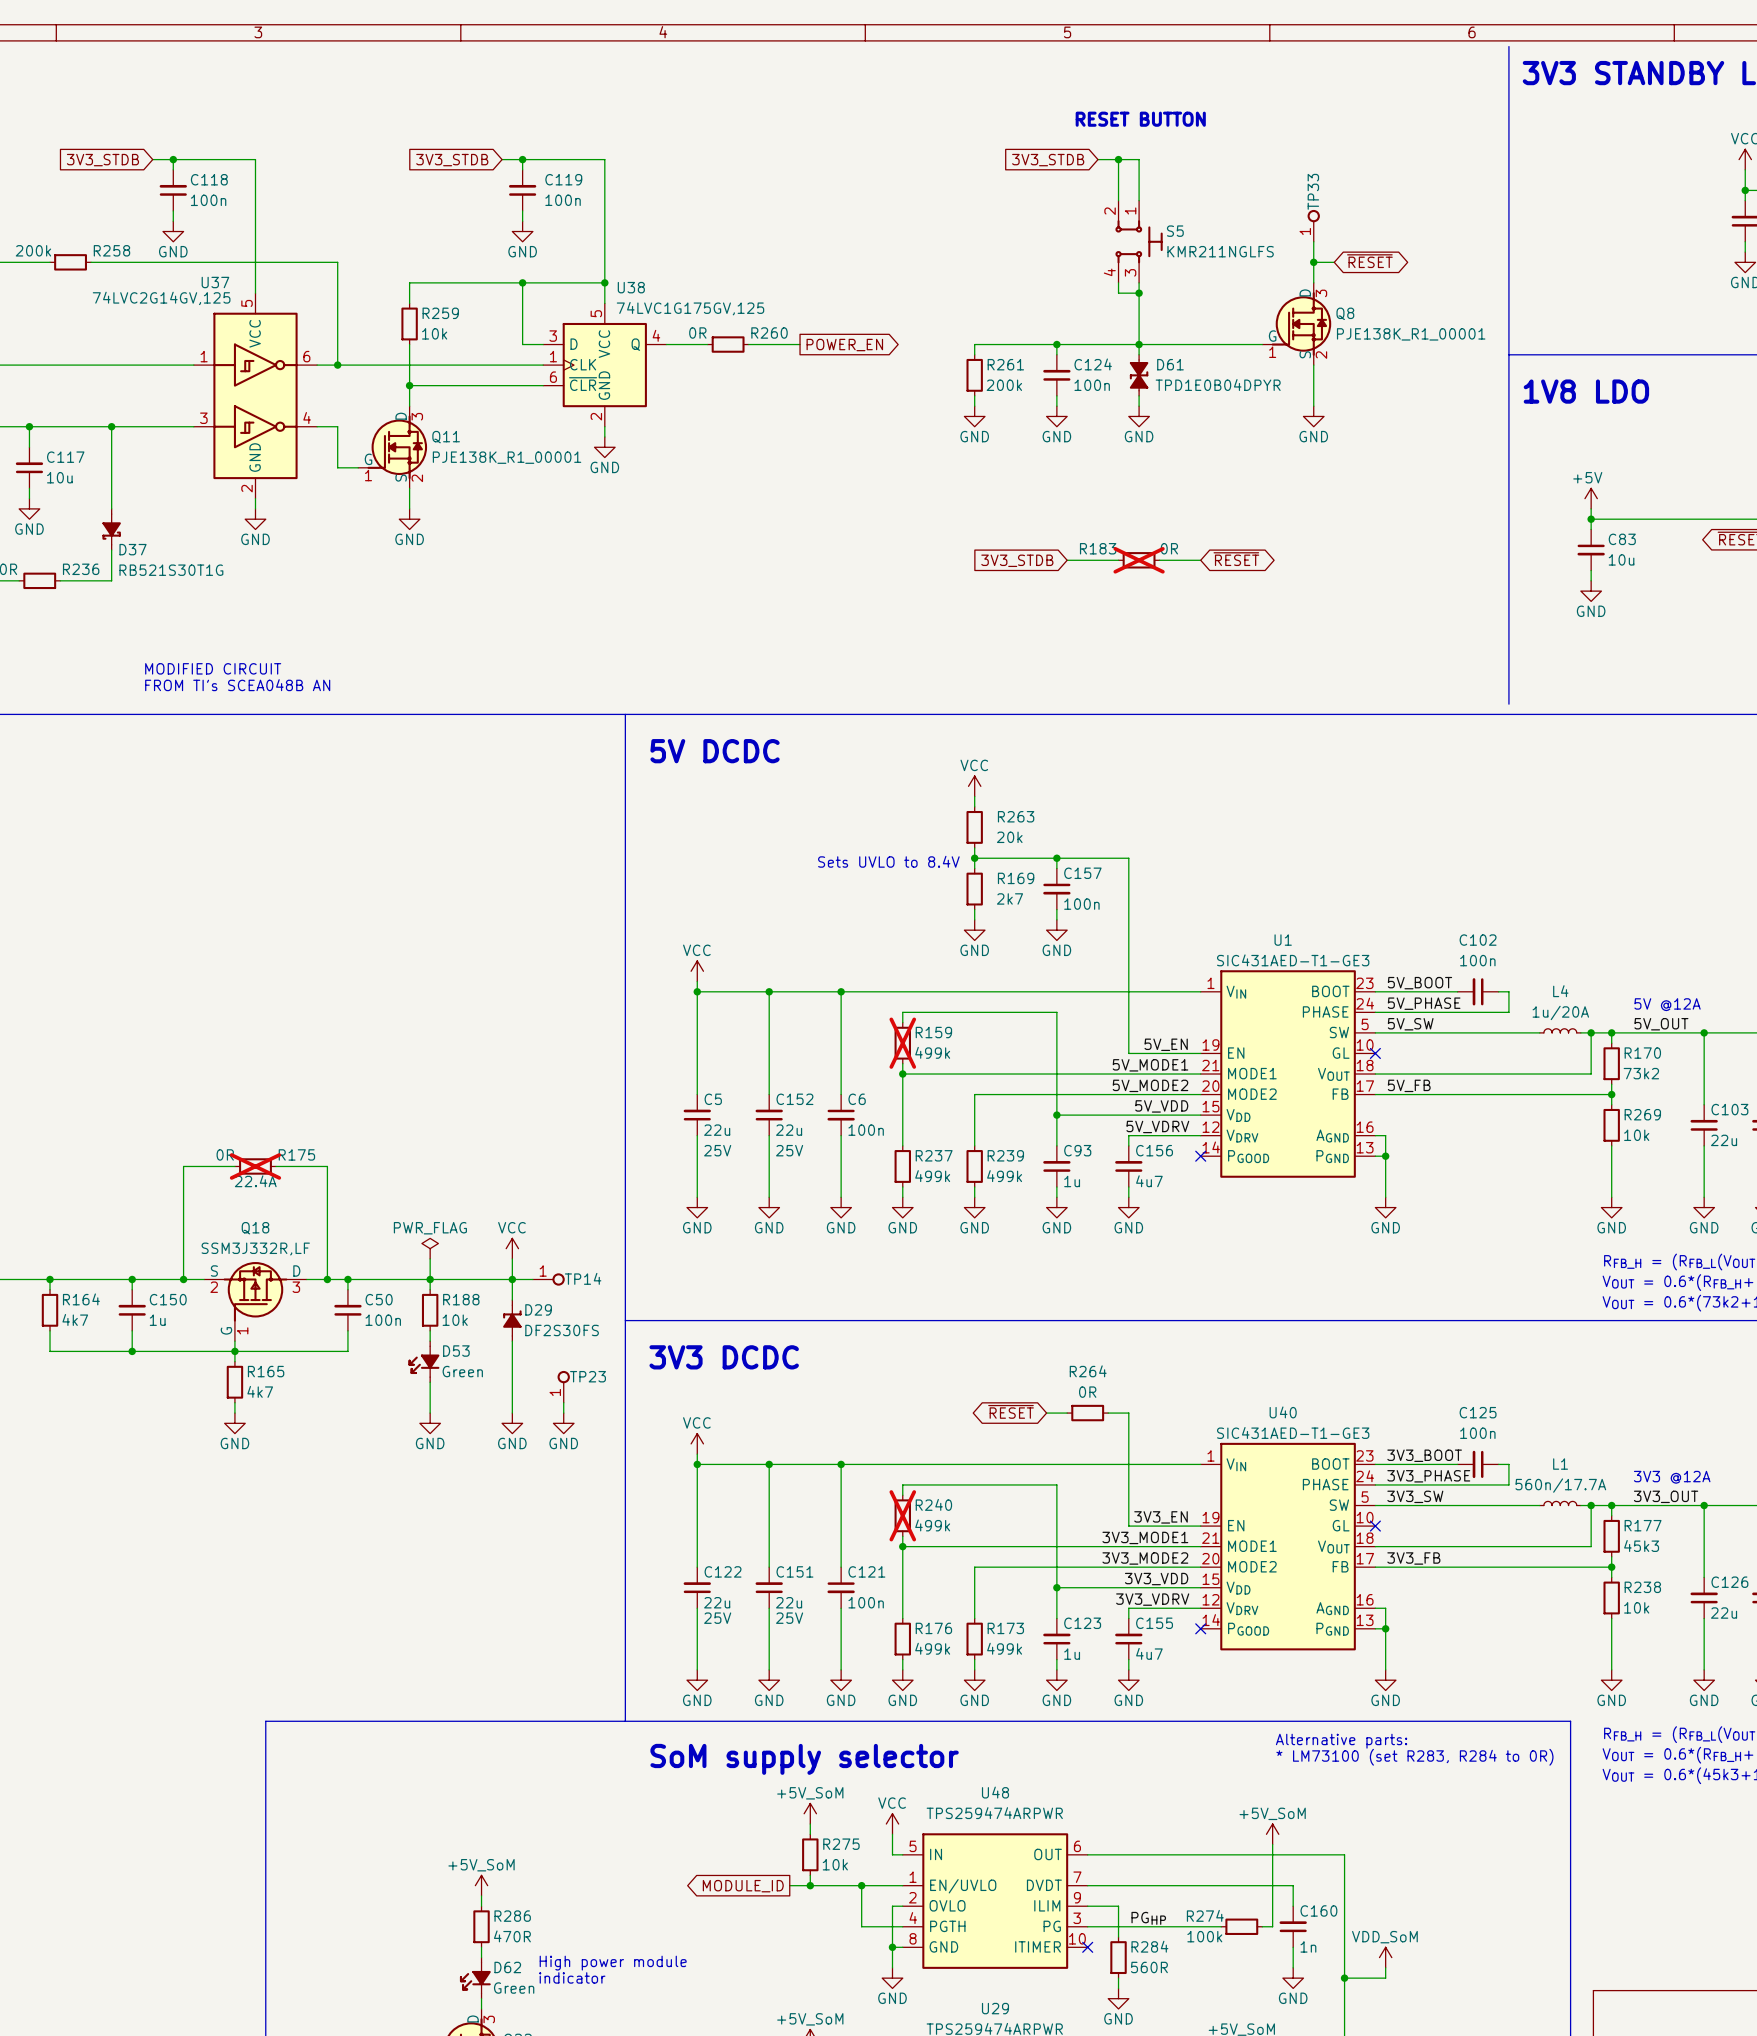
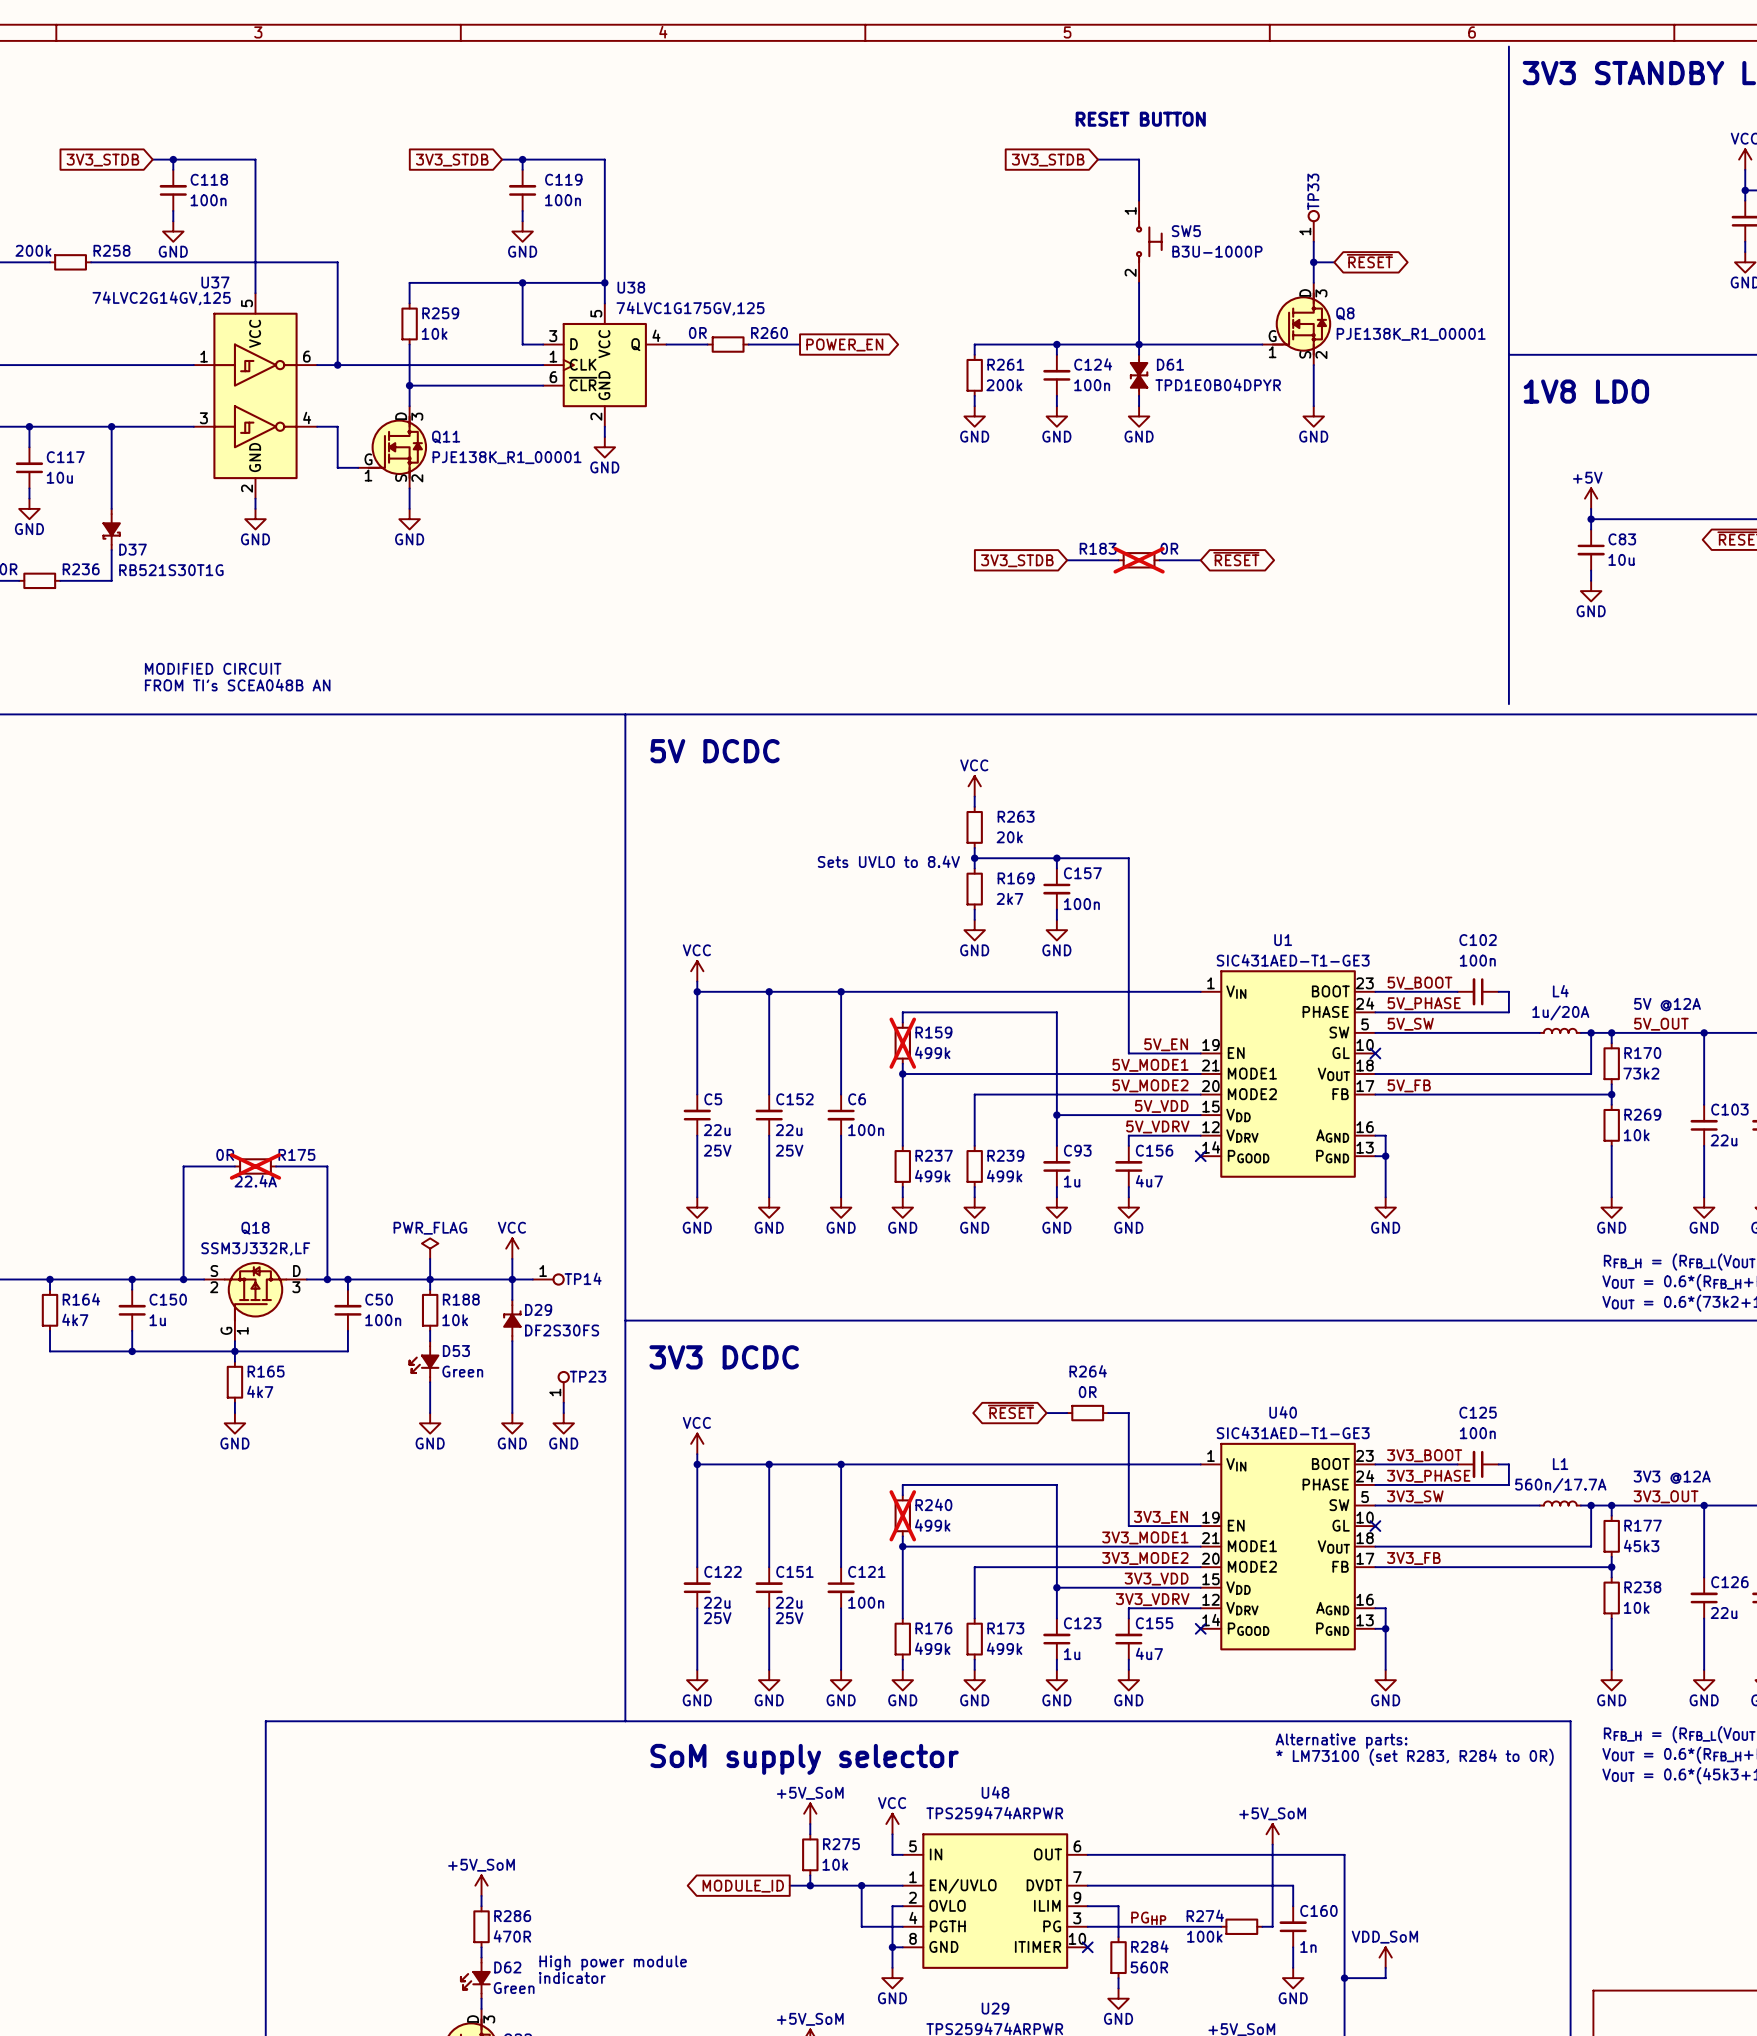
wire: (1118, 159) (1118, 200) -> none
junction: (1118, 159) -> none
S5: (1139, 241) -> none
SW5: none -> (1149, 241)
wire: (1118, 282) (1118, 293) (1139, 293) -> none
junction: (1139, 293) -> none

